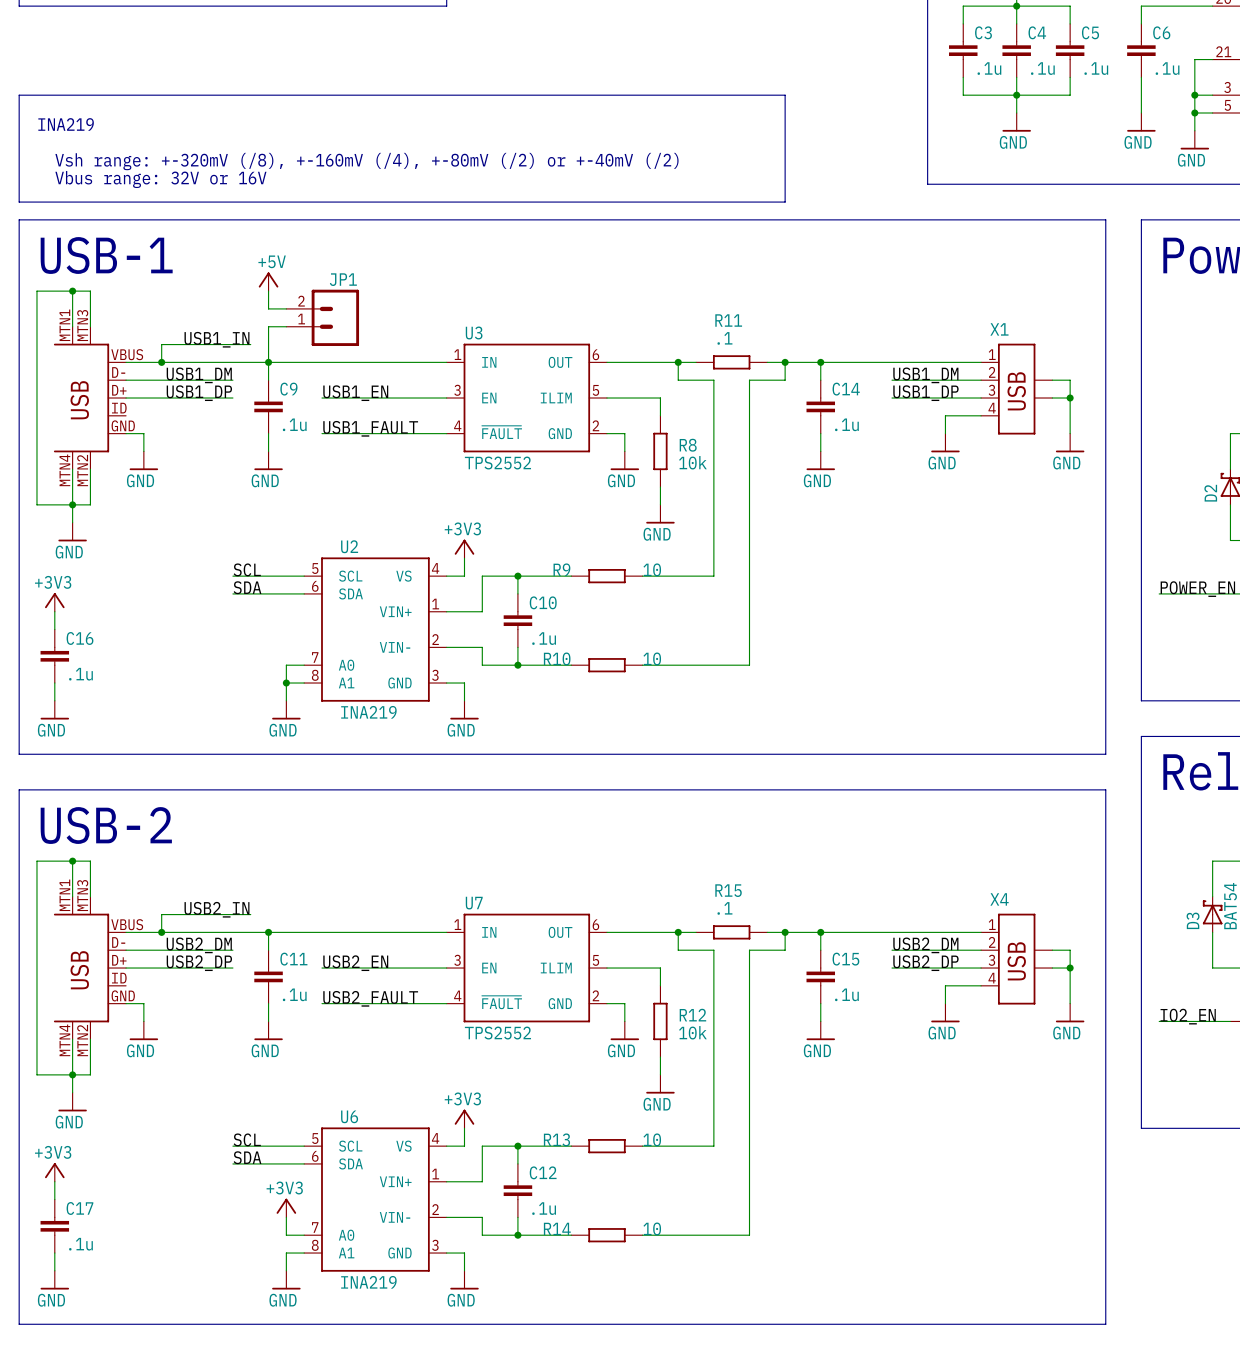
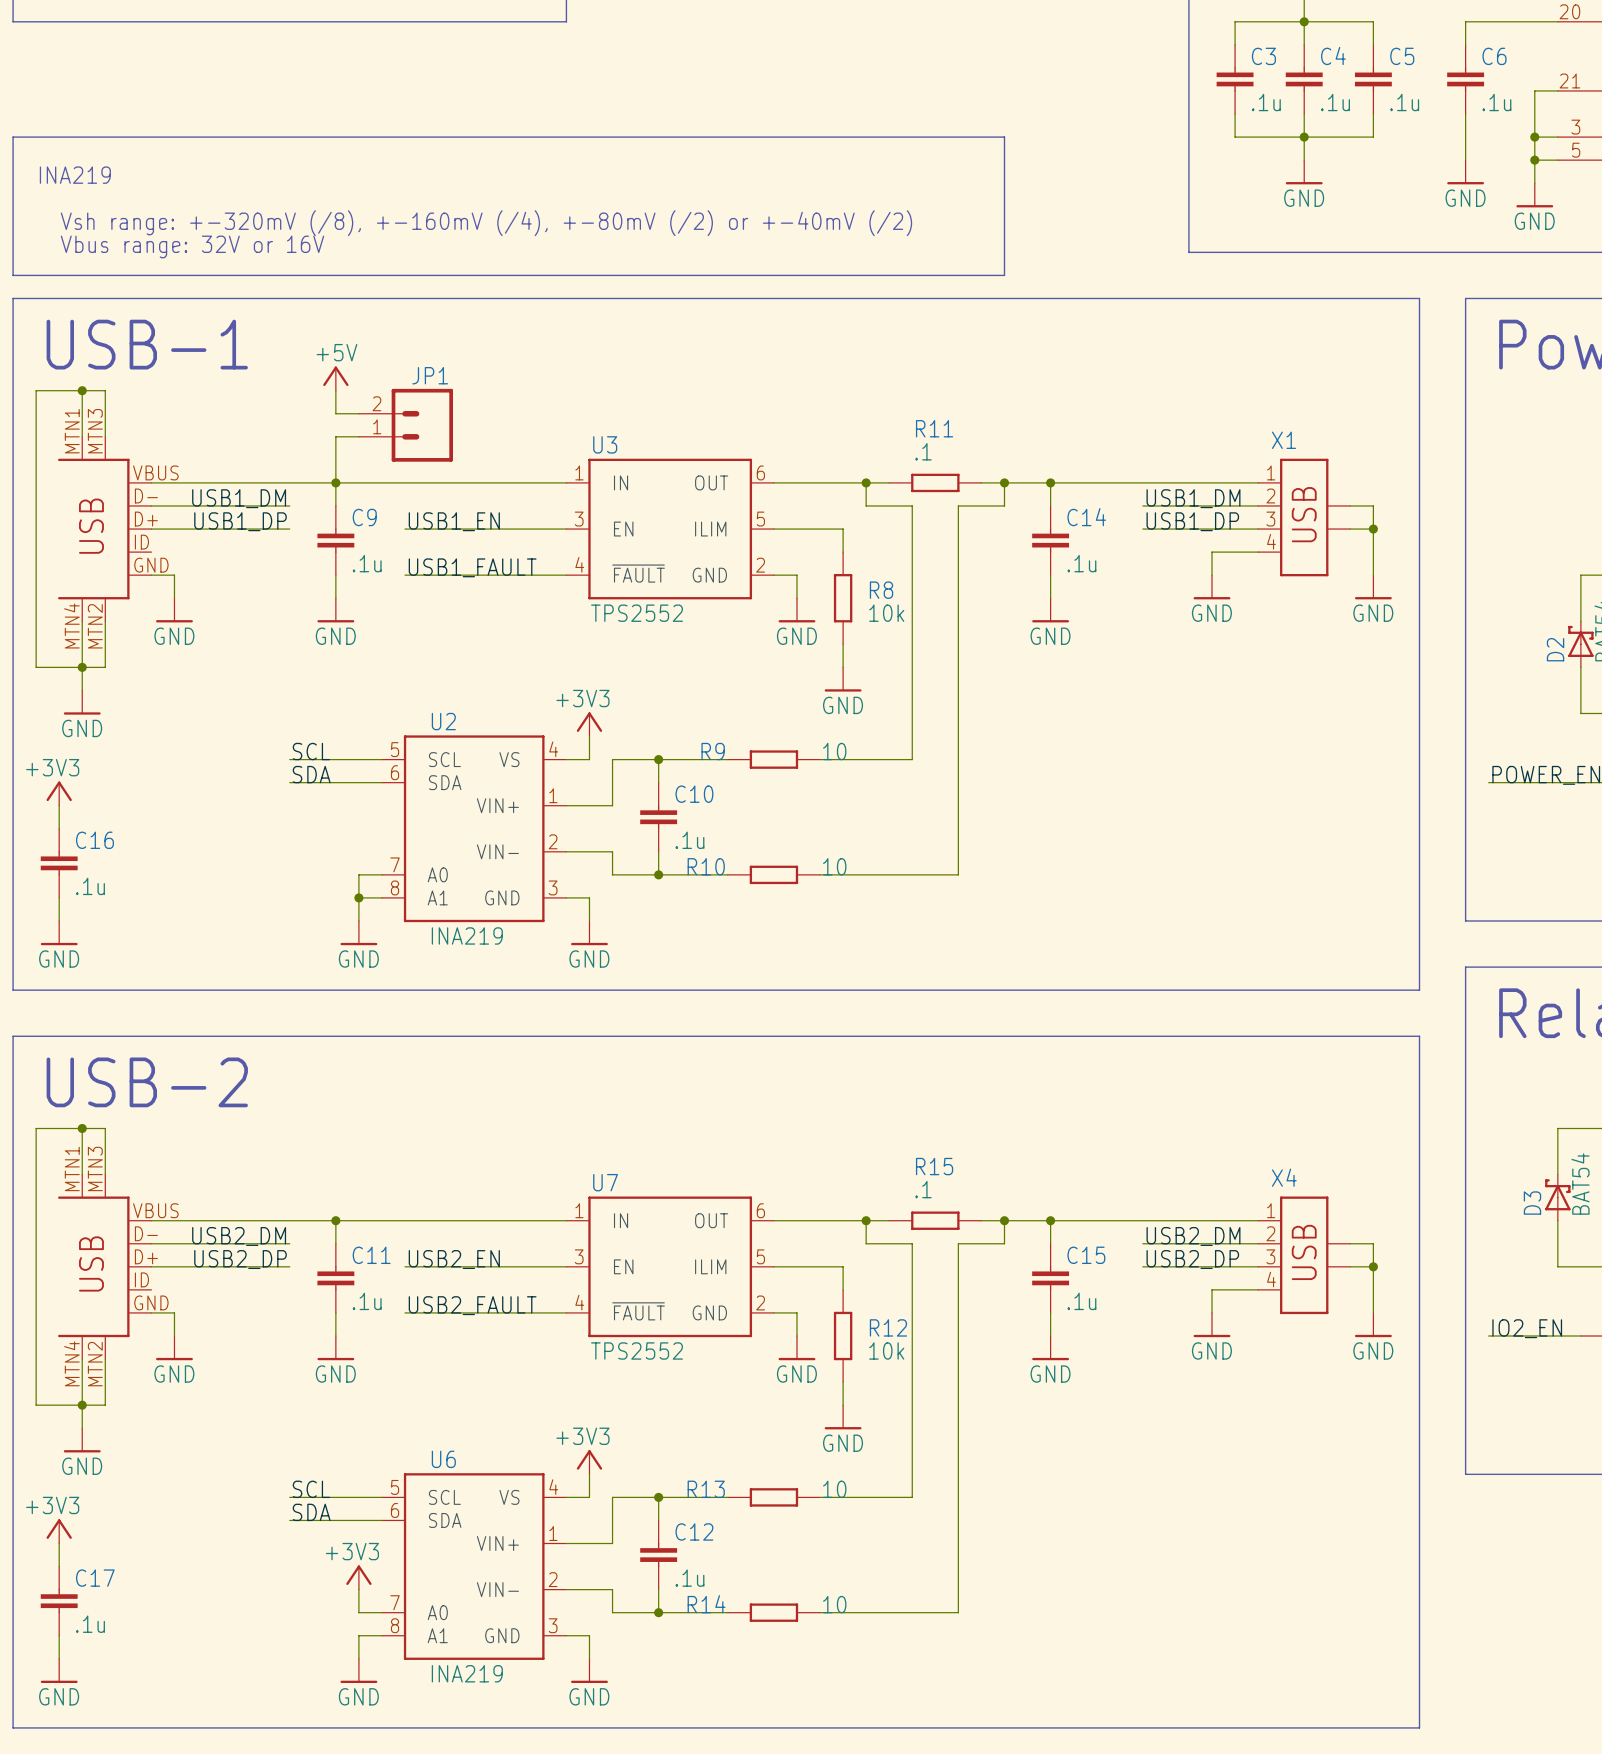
label: USB1_IN (216, 339) -> none
wire: (250, 344) (161, 344) (161, 362) -> none
junction: (161, 362) -> none
label: USB2_IN (216, 909) -> none
wire: (250, 914) (161, 914) (161, 932) -> none
junction: (161, 932) -> none

